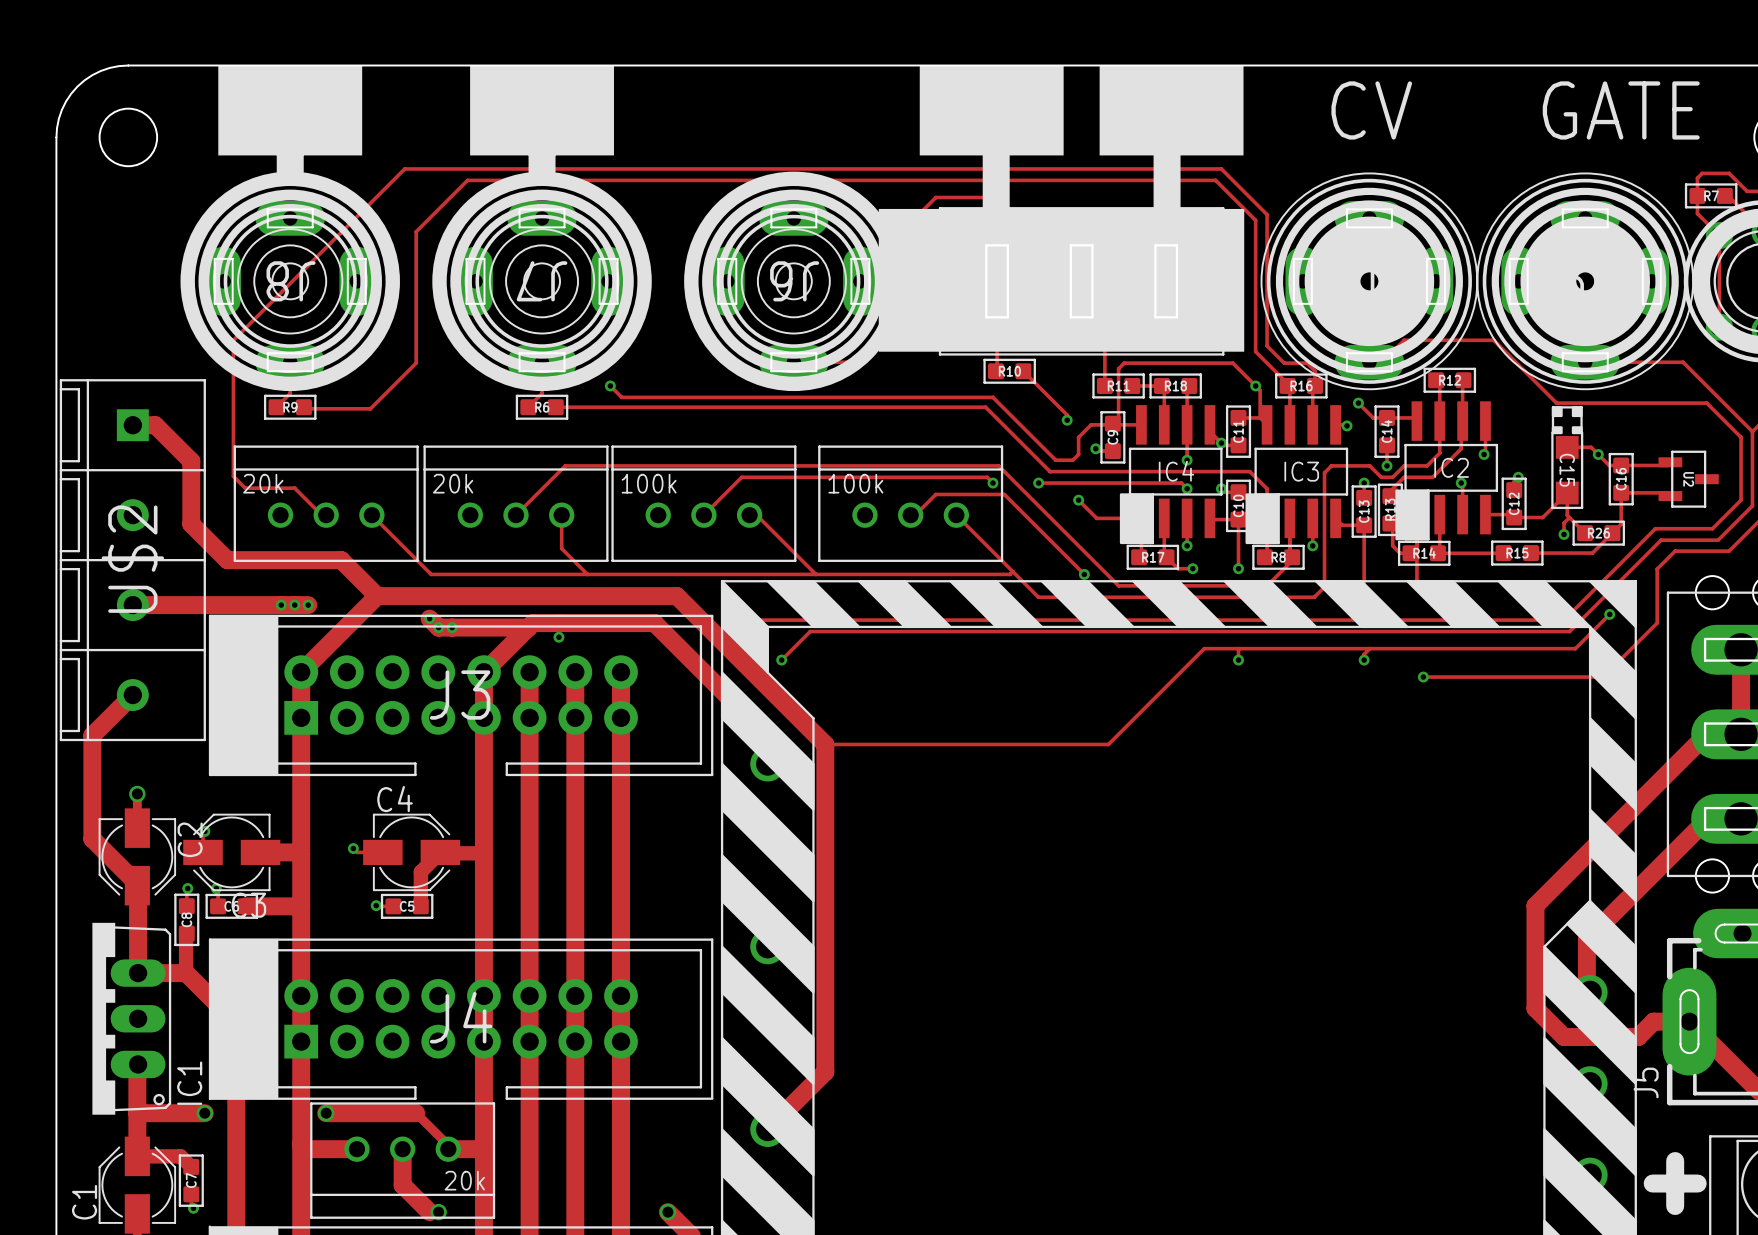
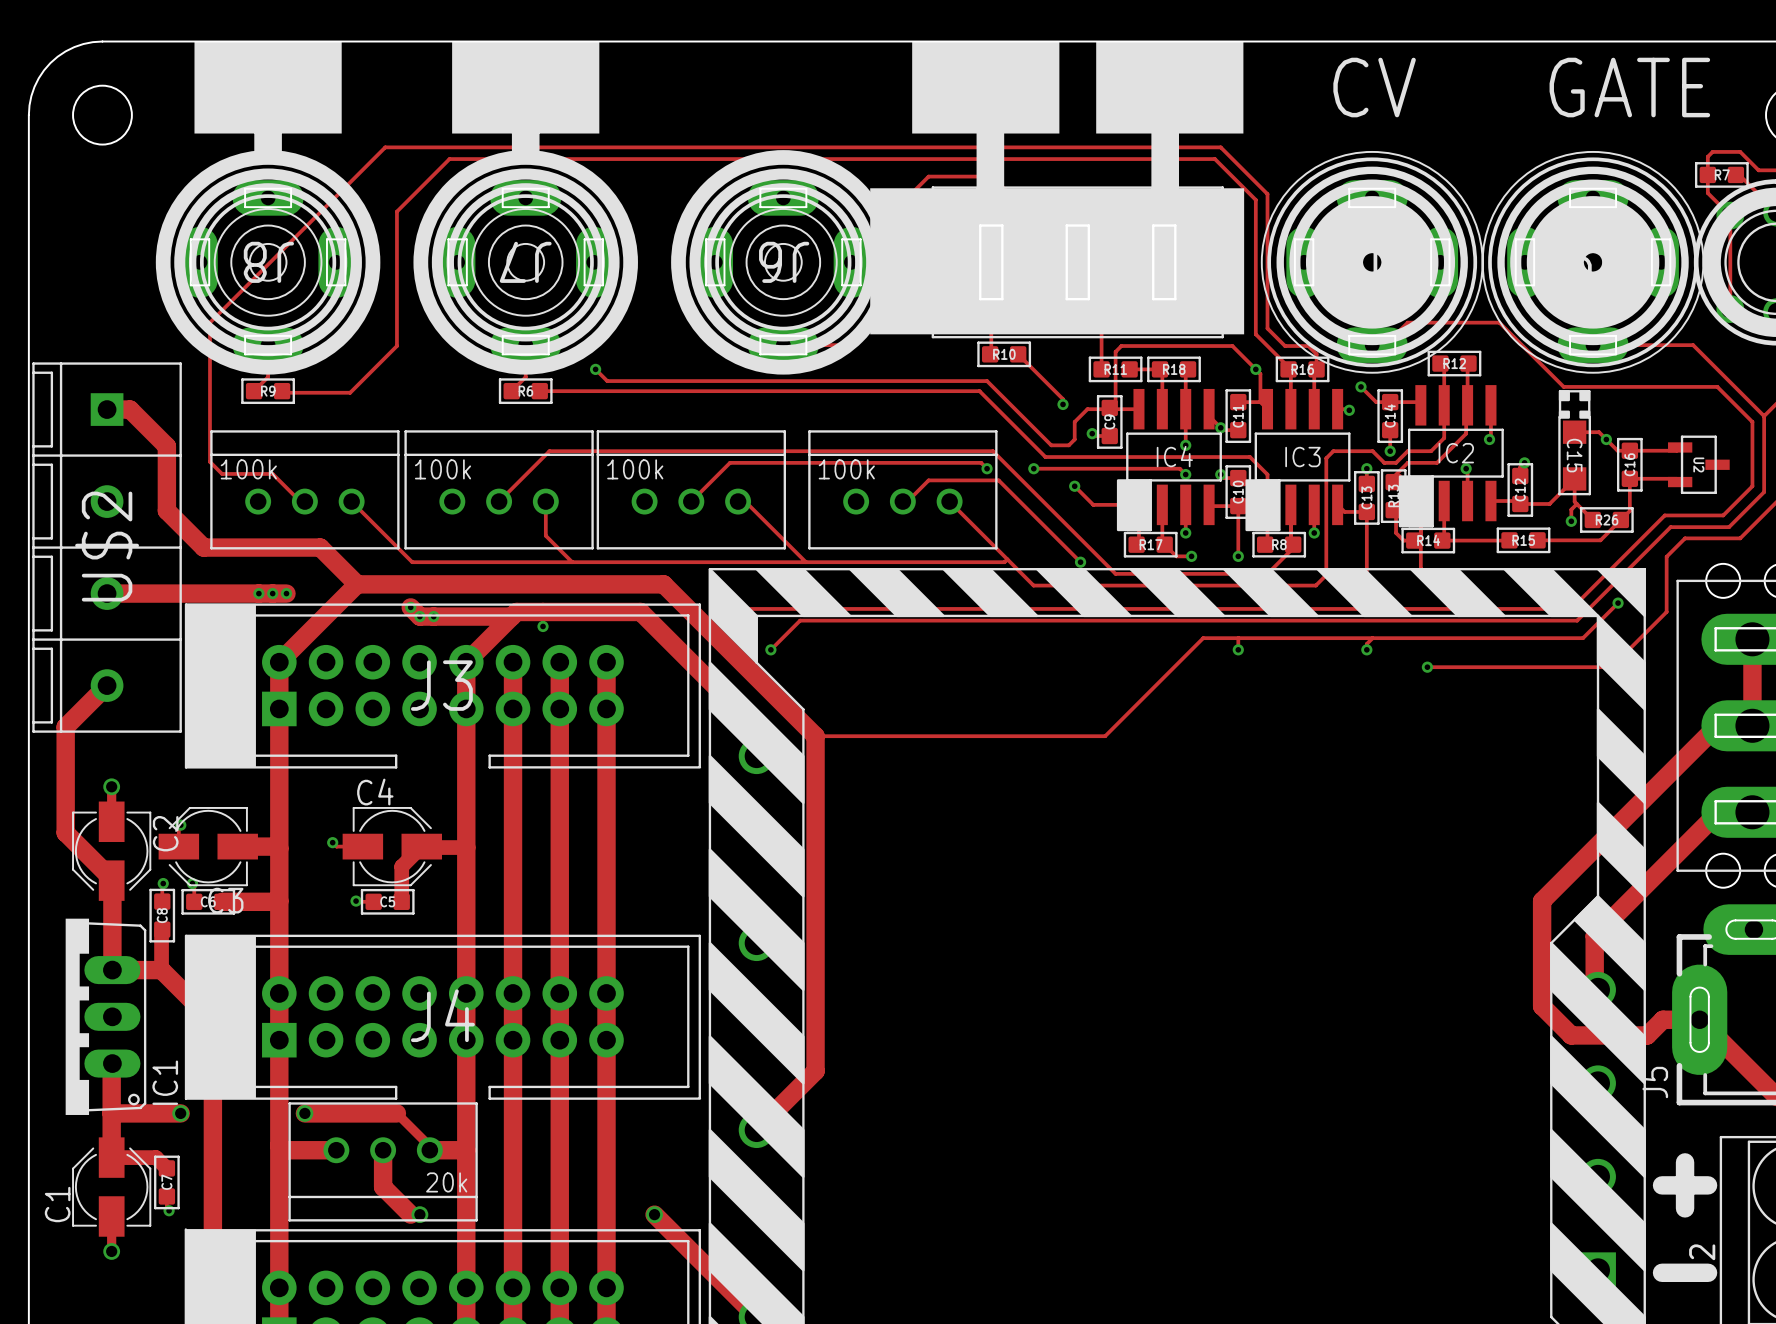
part value: 20k (263, 483) -> 100k (248, 469)
part value: 20k (453, 483) -> 100k (443, 469)

